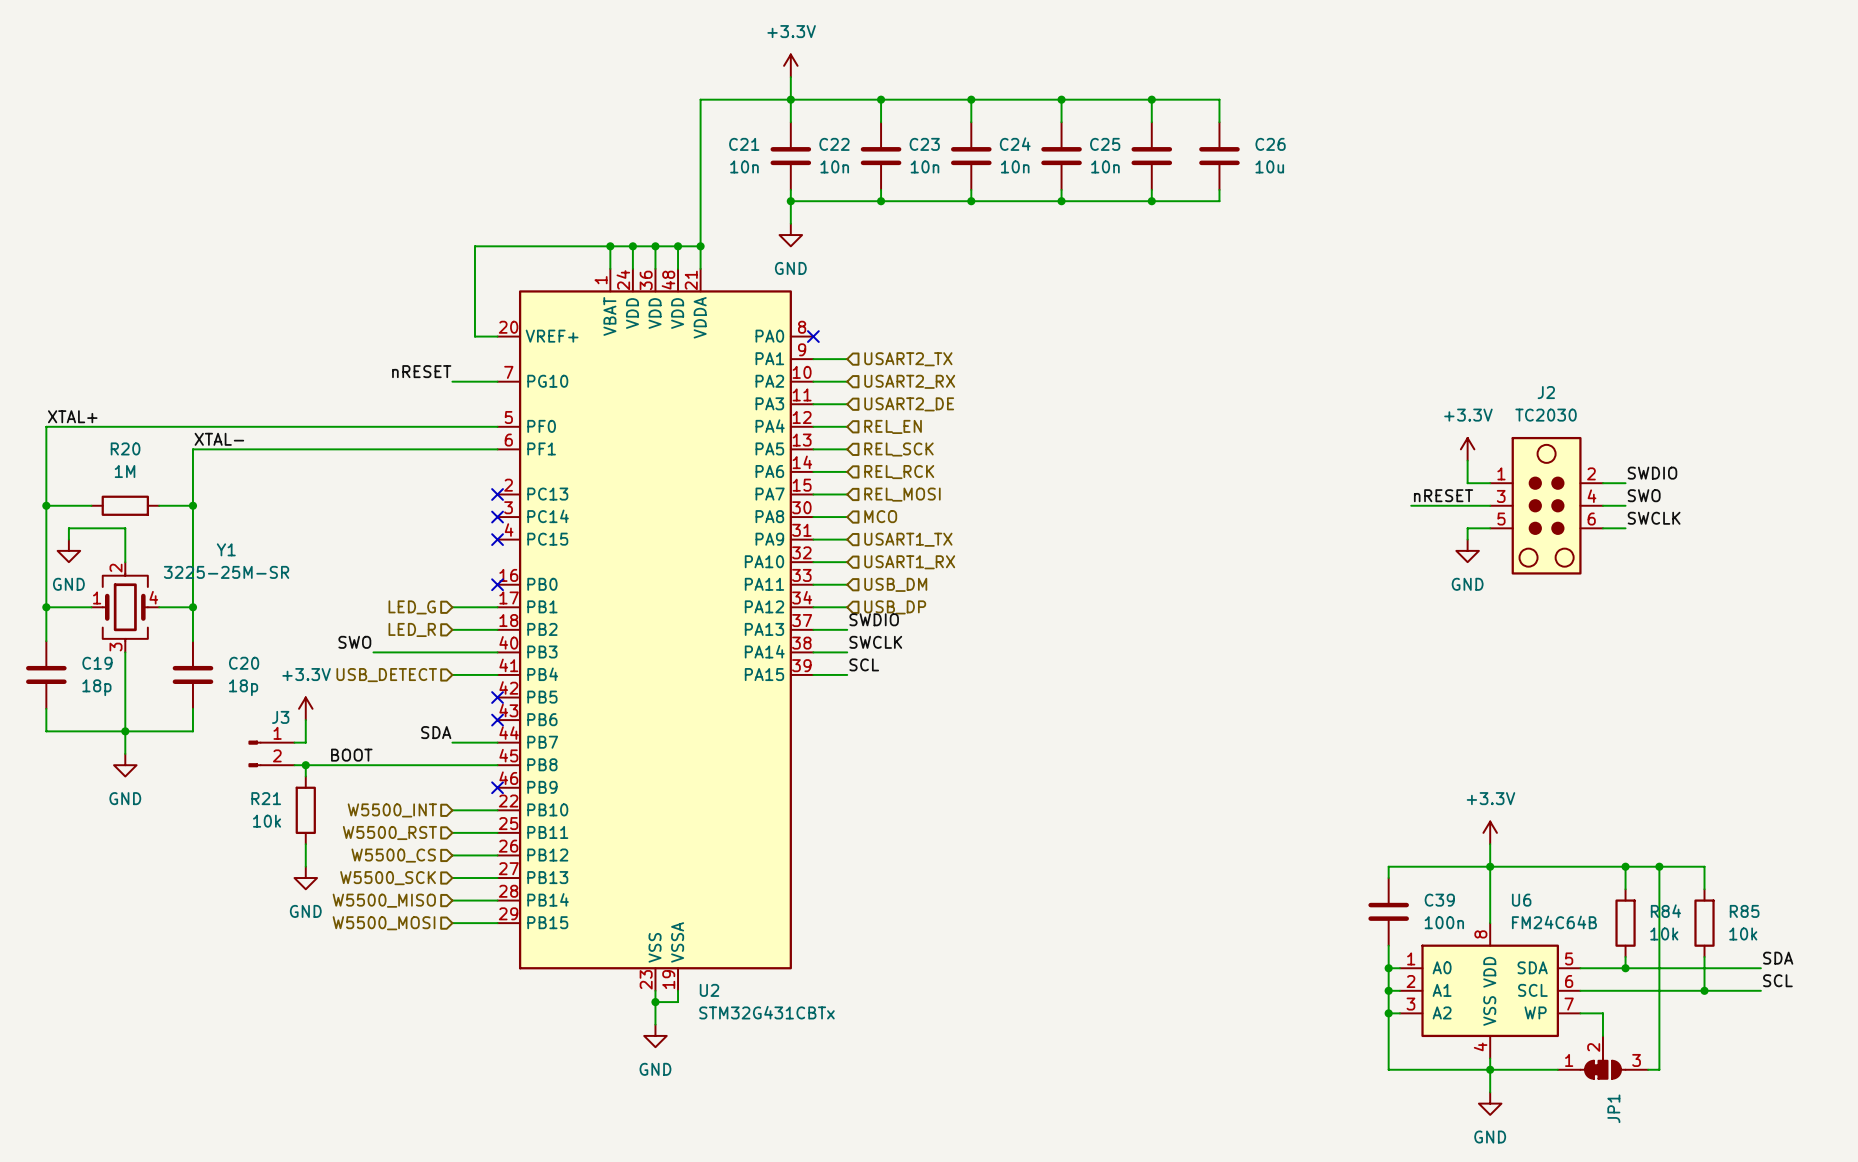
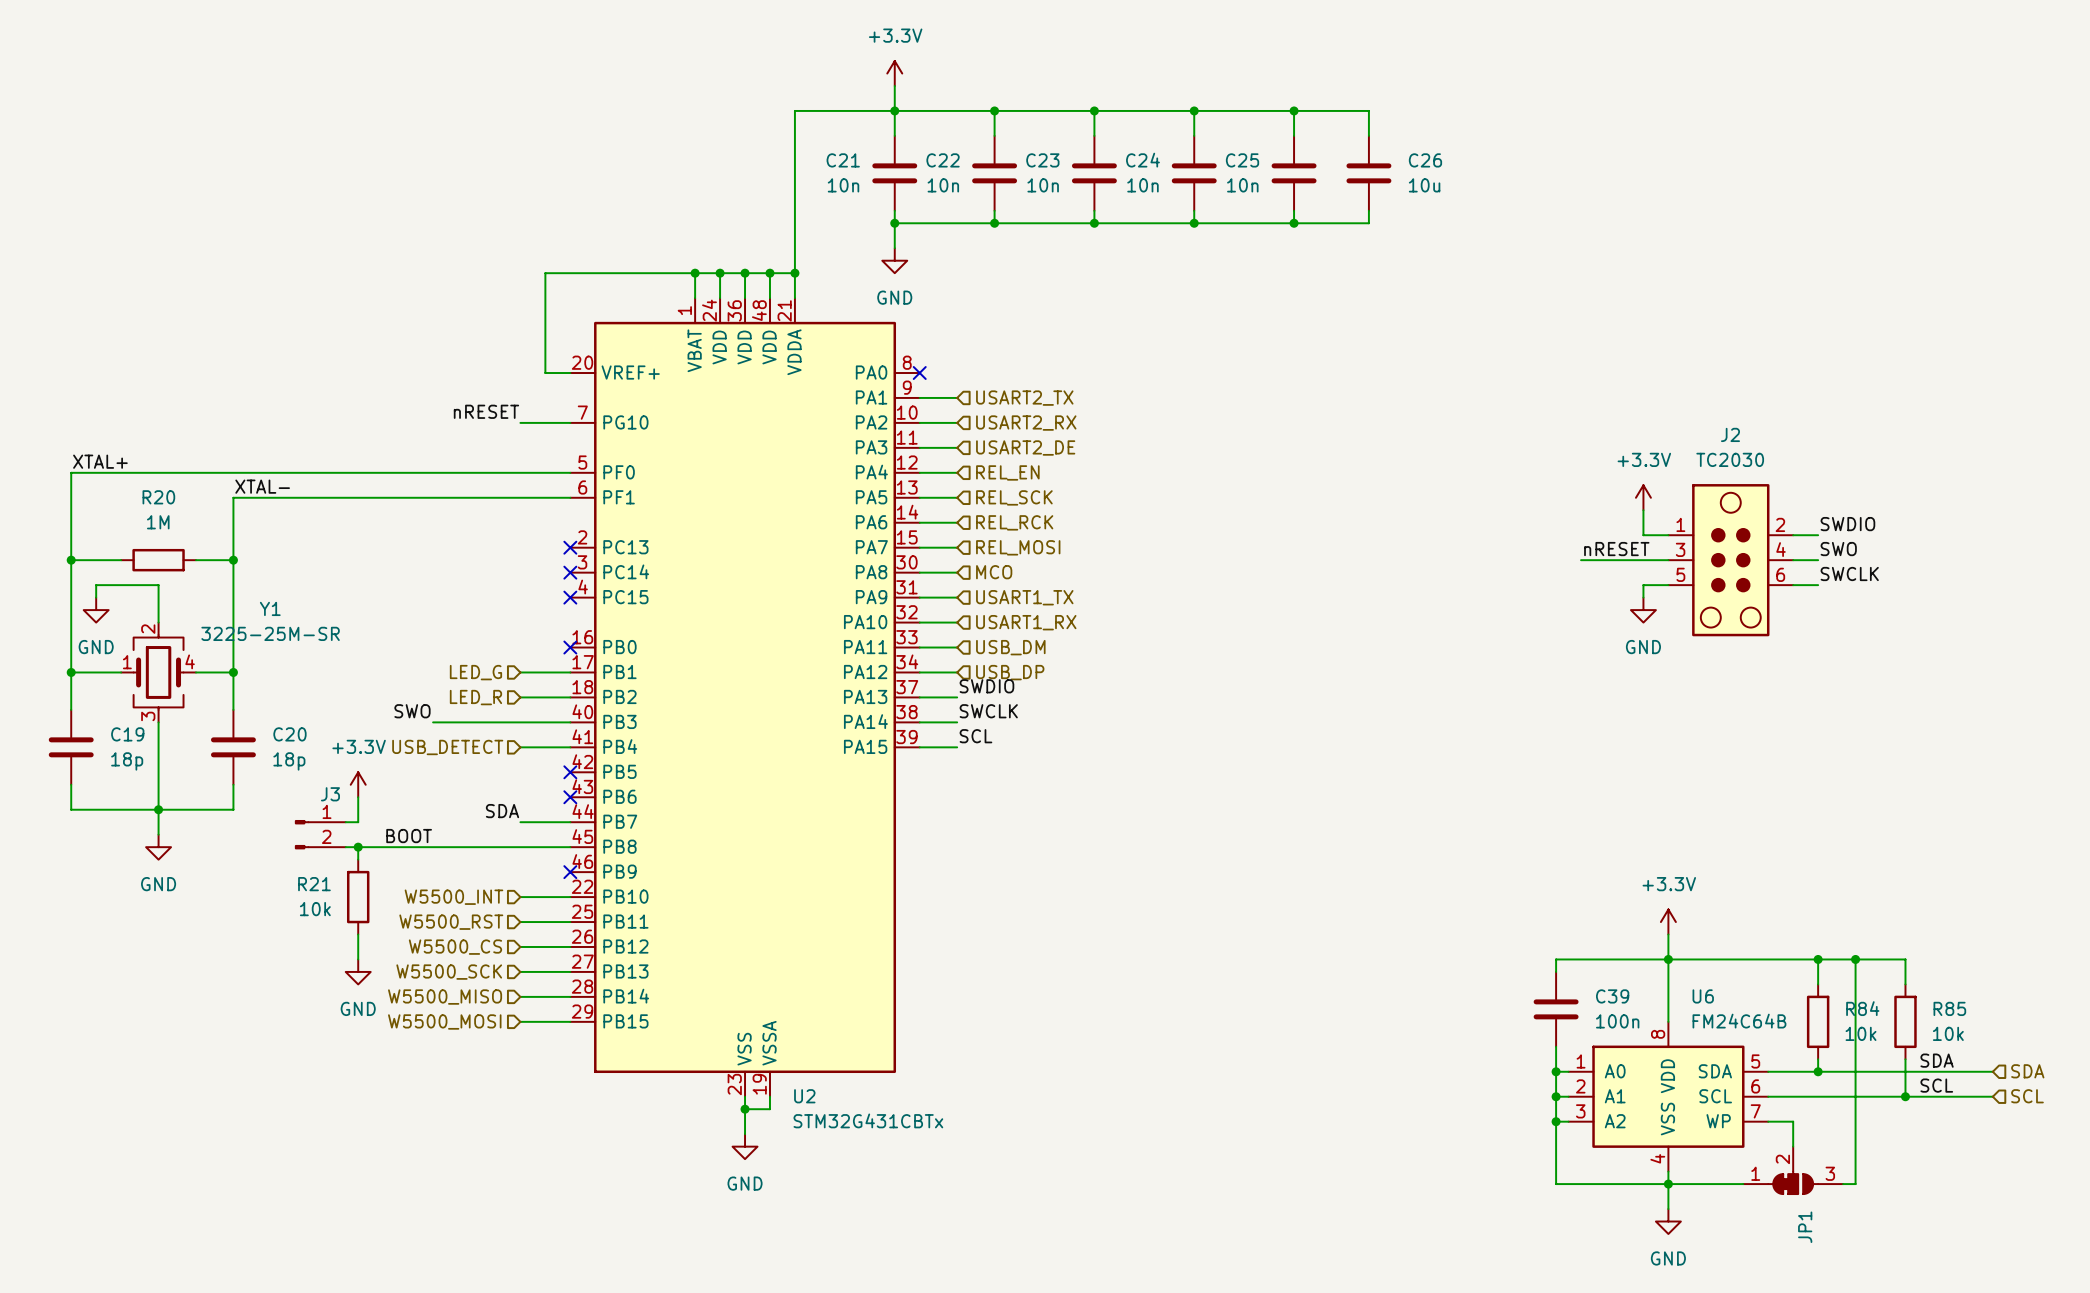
label position: SDA (1778, 958) -> SDA (1937, 1060)
hierarchical label: none -> SDA (2027, 1071)
wire: none -> (1967, 1071) (1992, 1071)
label position: SCL (1777, 980) -> SCL (1936, 1085)
wire: none -> (1967, 1096) (1992, 1096)
hierarchical label: none -> SCL (2027, 1096)

